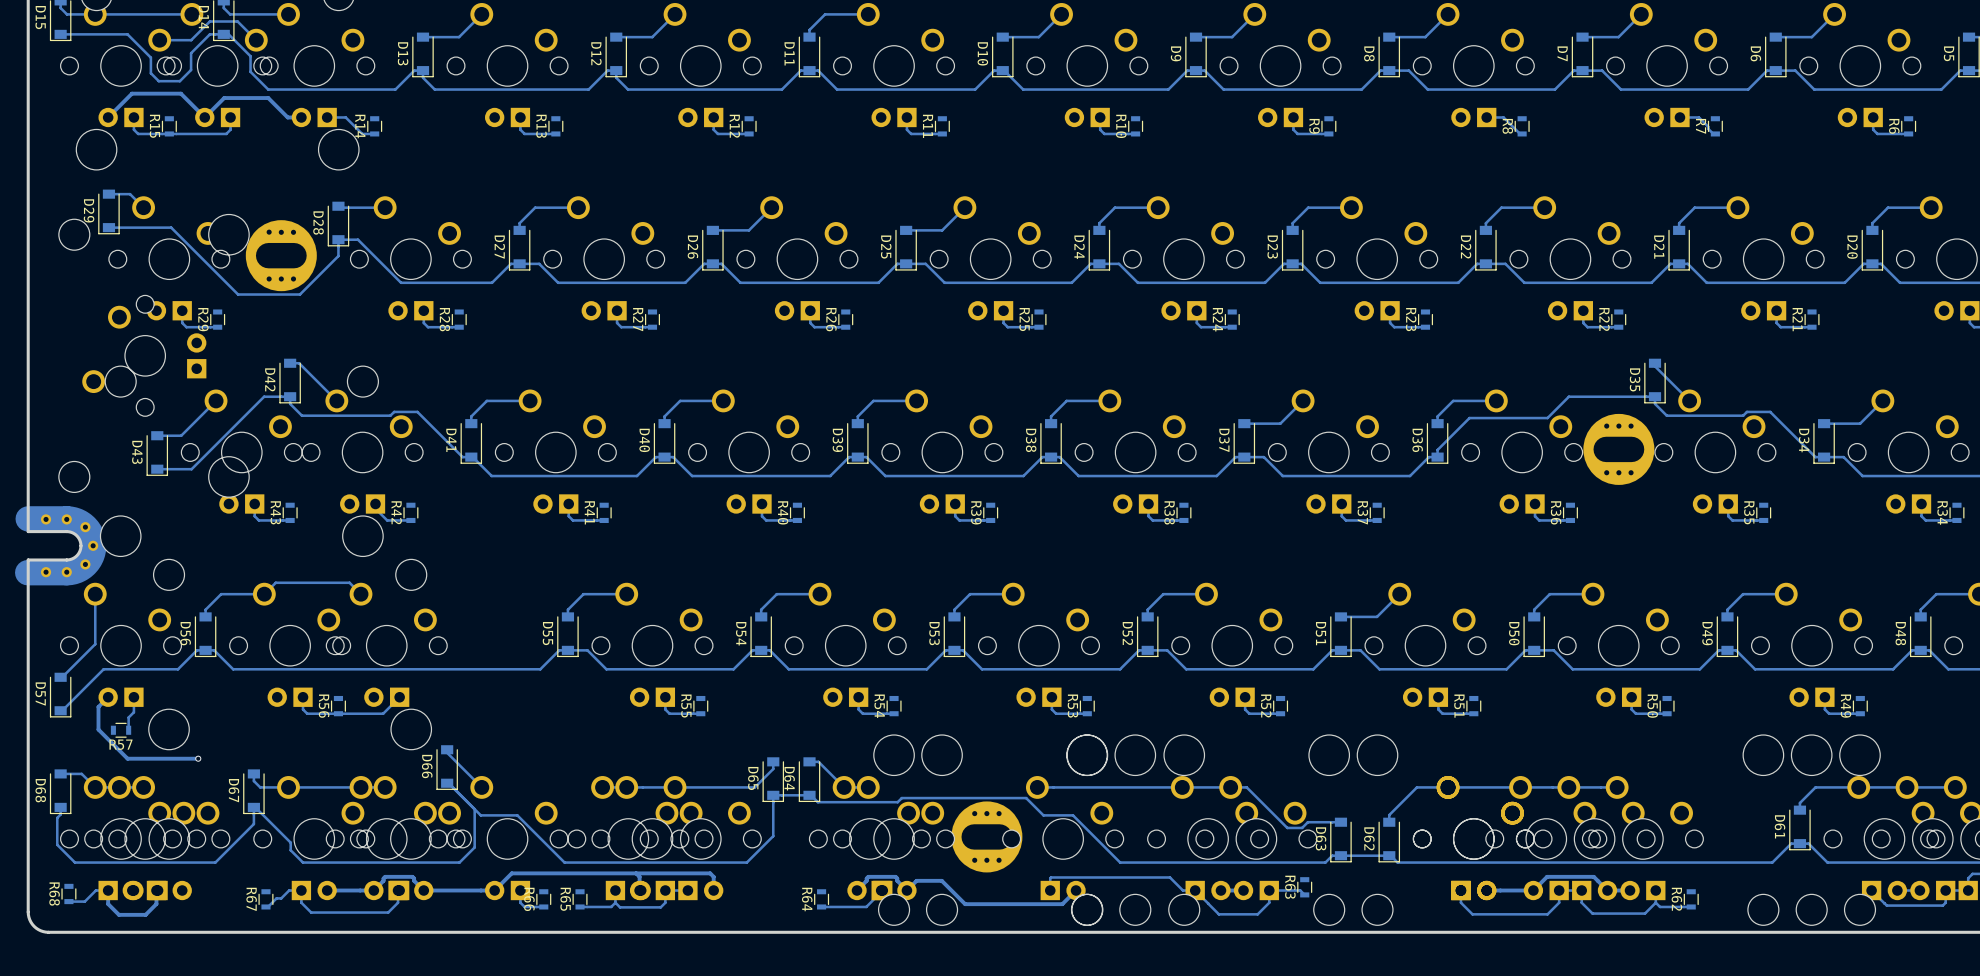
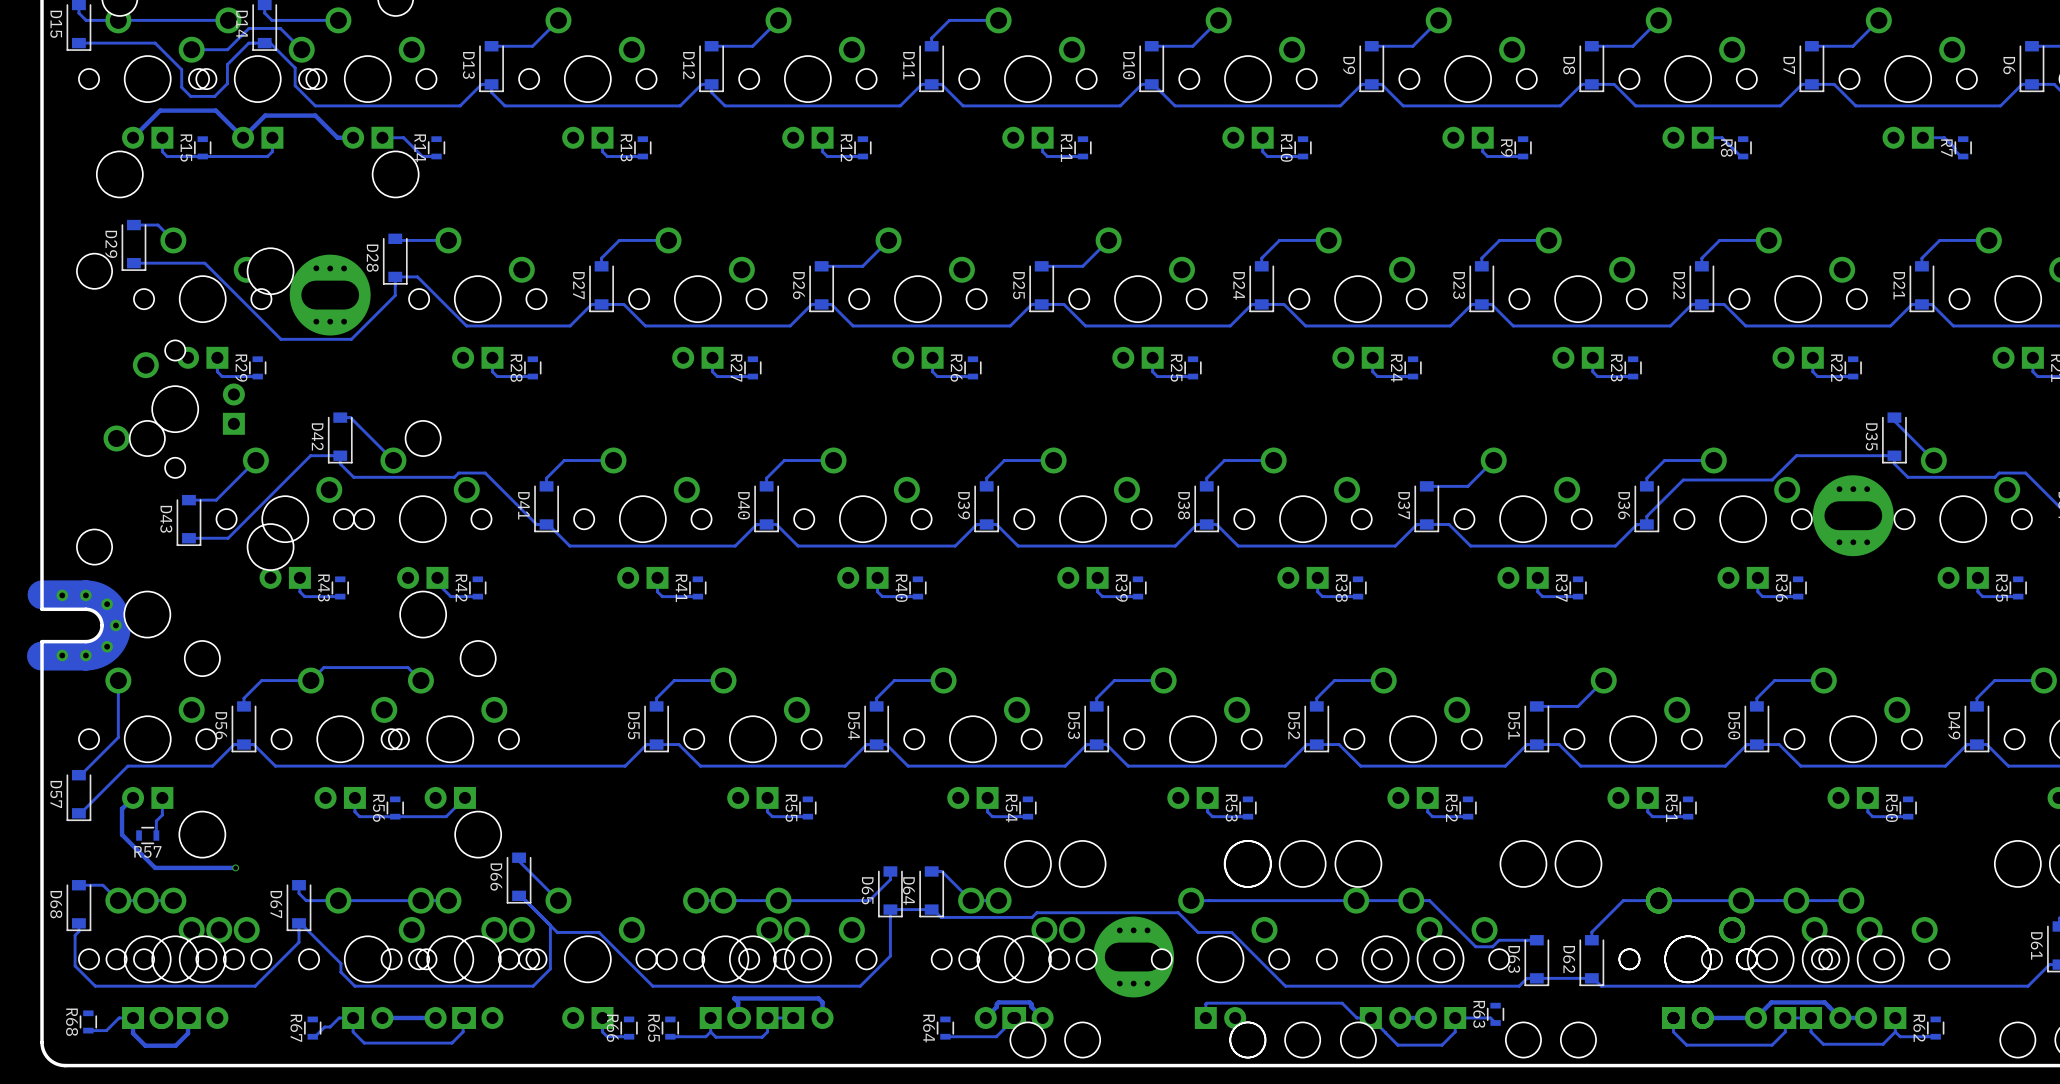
track: (636, 873) (511, 873) (494, 890) (423, 890) (412, 876) (385, 876) (373, 890) -> none
track: (1076, 890) (1062, 904) (965, 904) (941, 880) (916, 880) (906, 890) -> none

